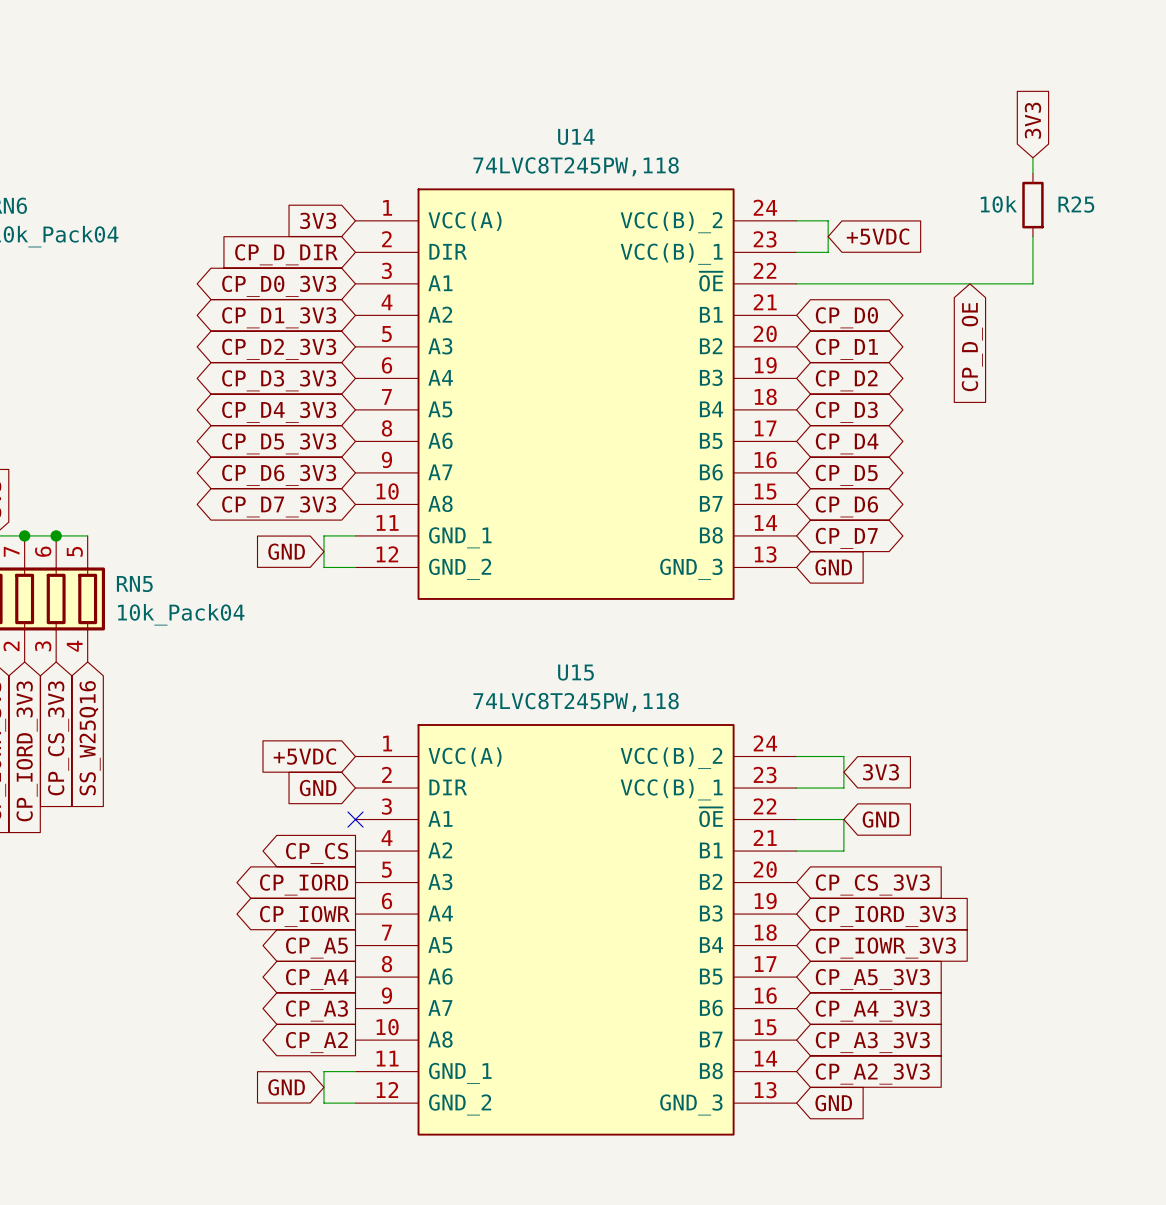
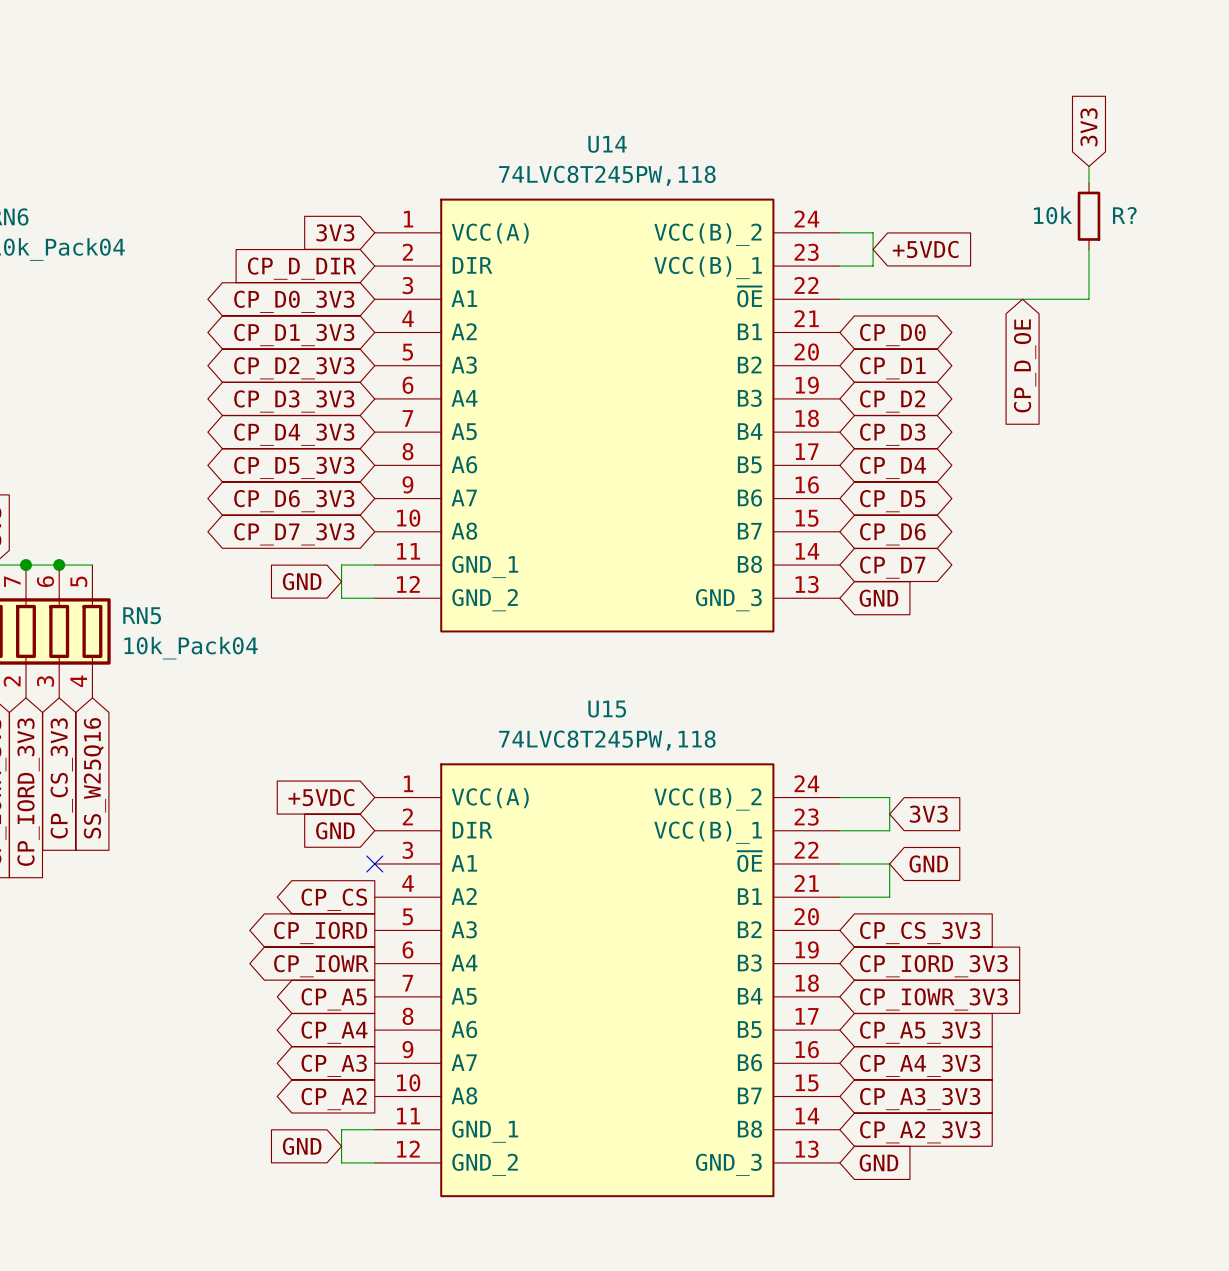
R25 name: R25 (1076, 204) -> R? (1124, 215)

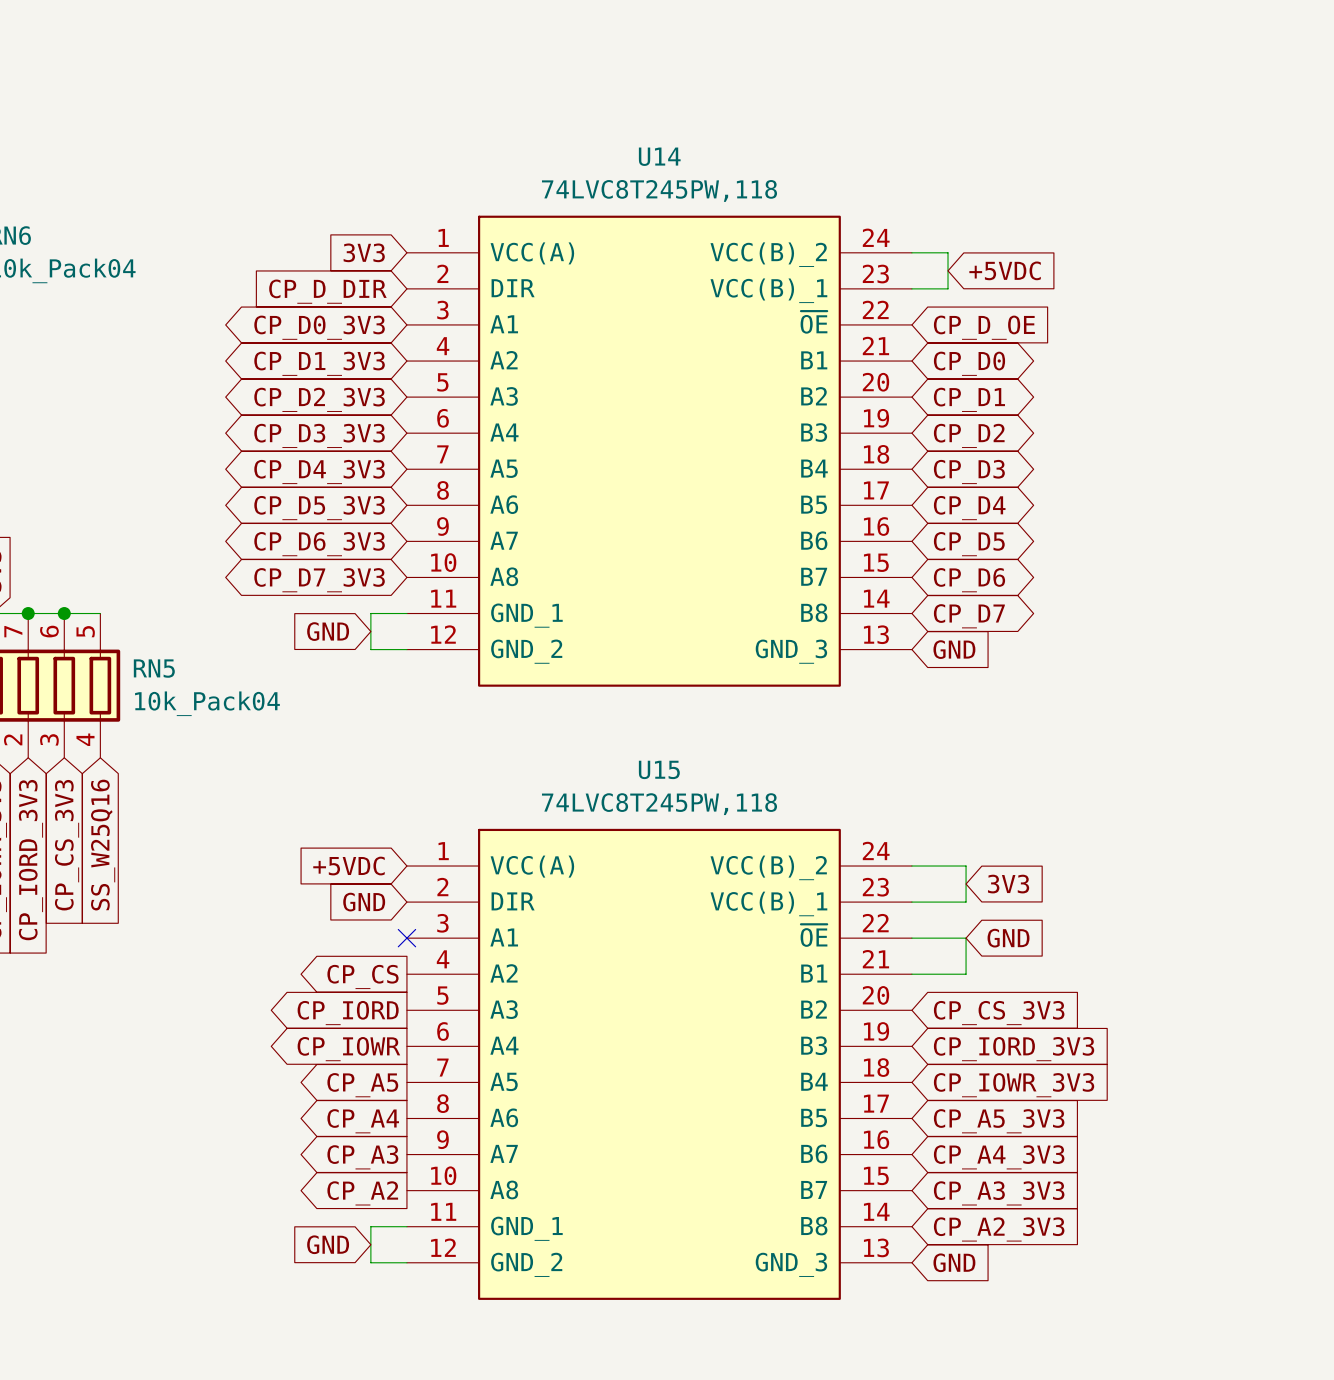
global label: 3V3 (1088, 127) -> none
wire: (1088, 166) (1088, 183) -> none
R?: 10k (1088, 216) -> none
wire: (1088, 249) (1088, 299) (839, 299) -> none
global label rotation: 0° (1025, 365) -> 90° counterclockwise (984, 327)

